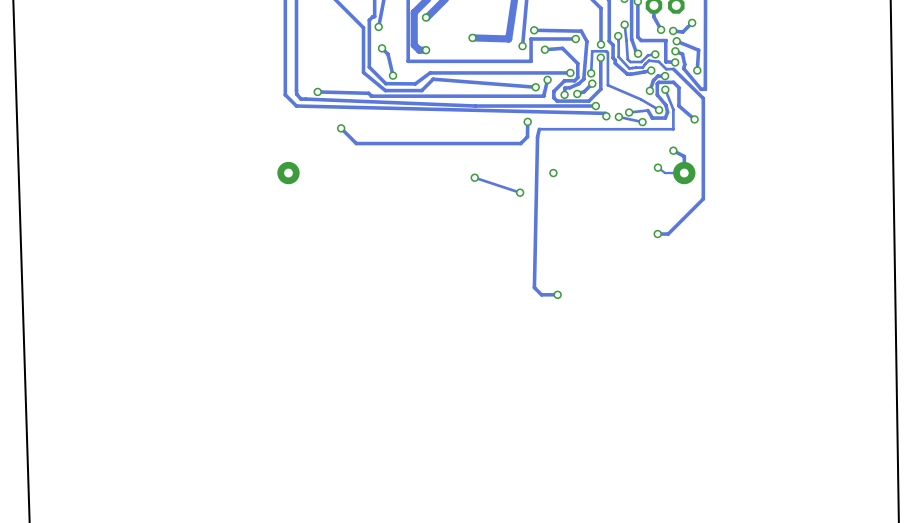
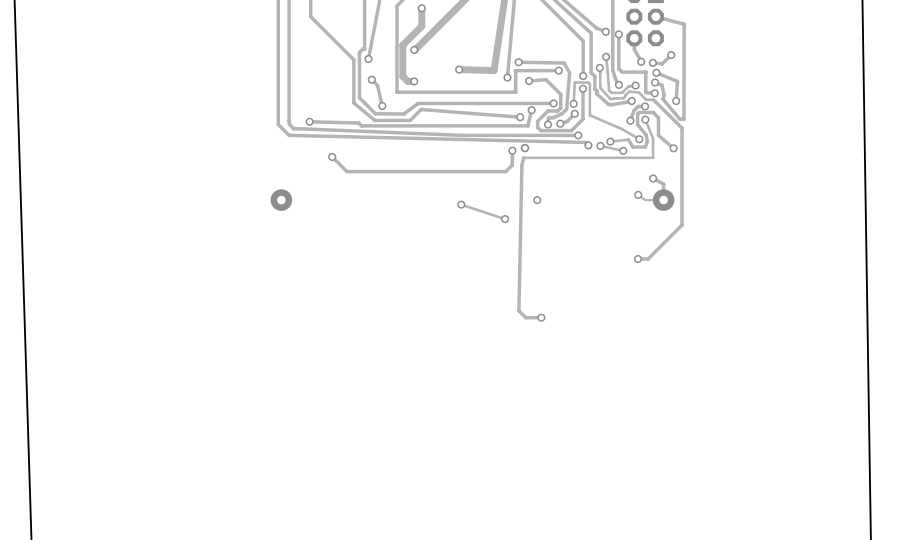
via: none -> (524, 148)

